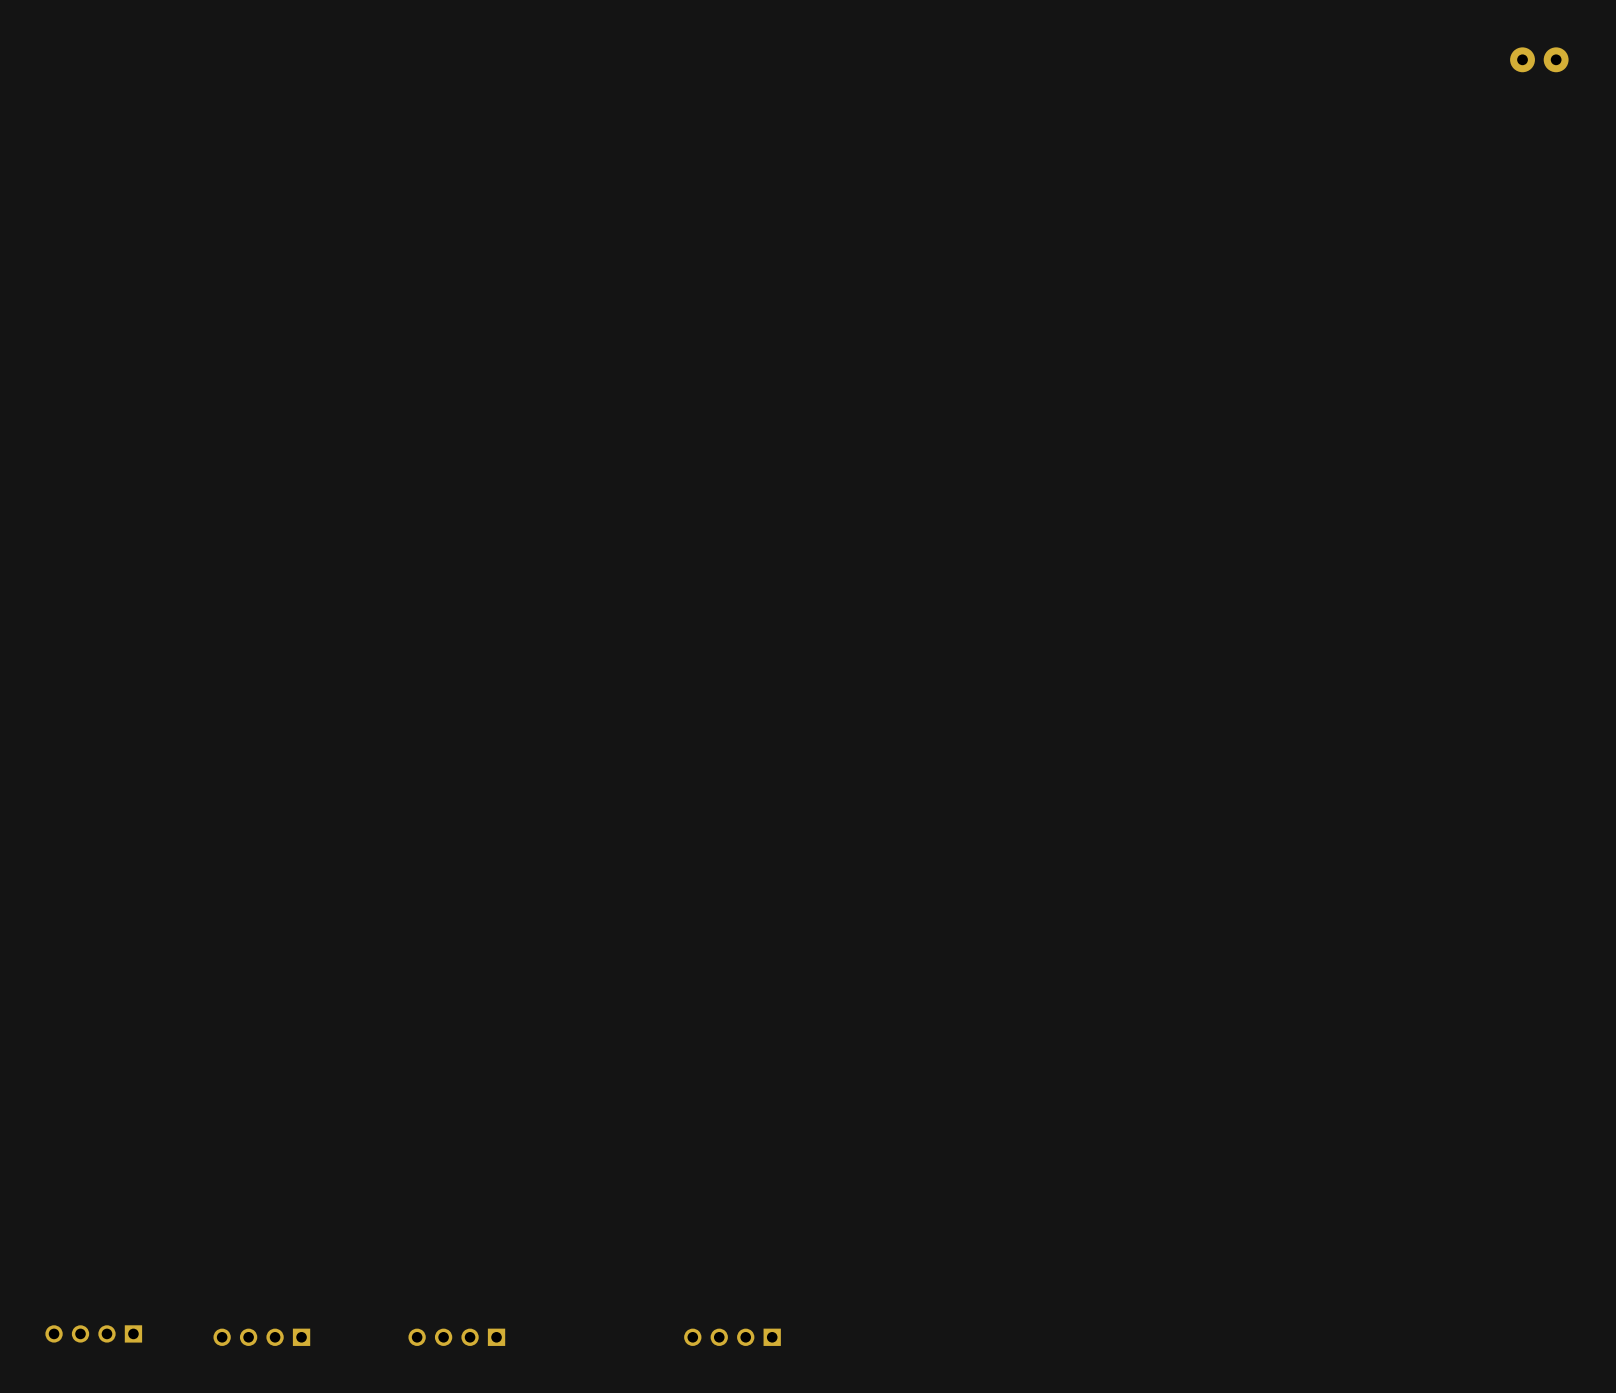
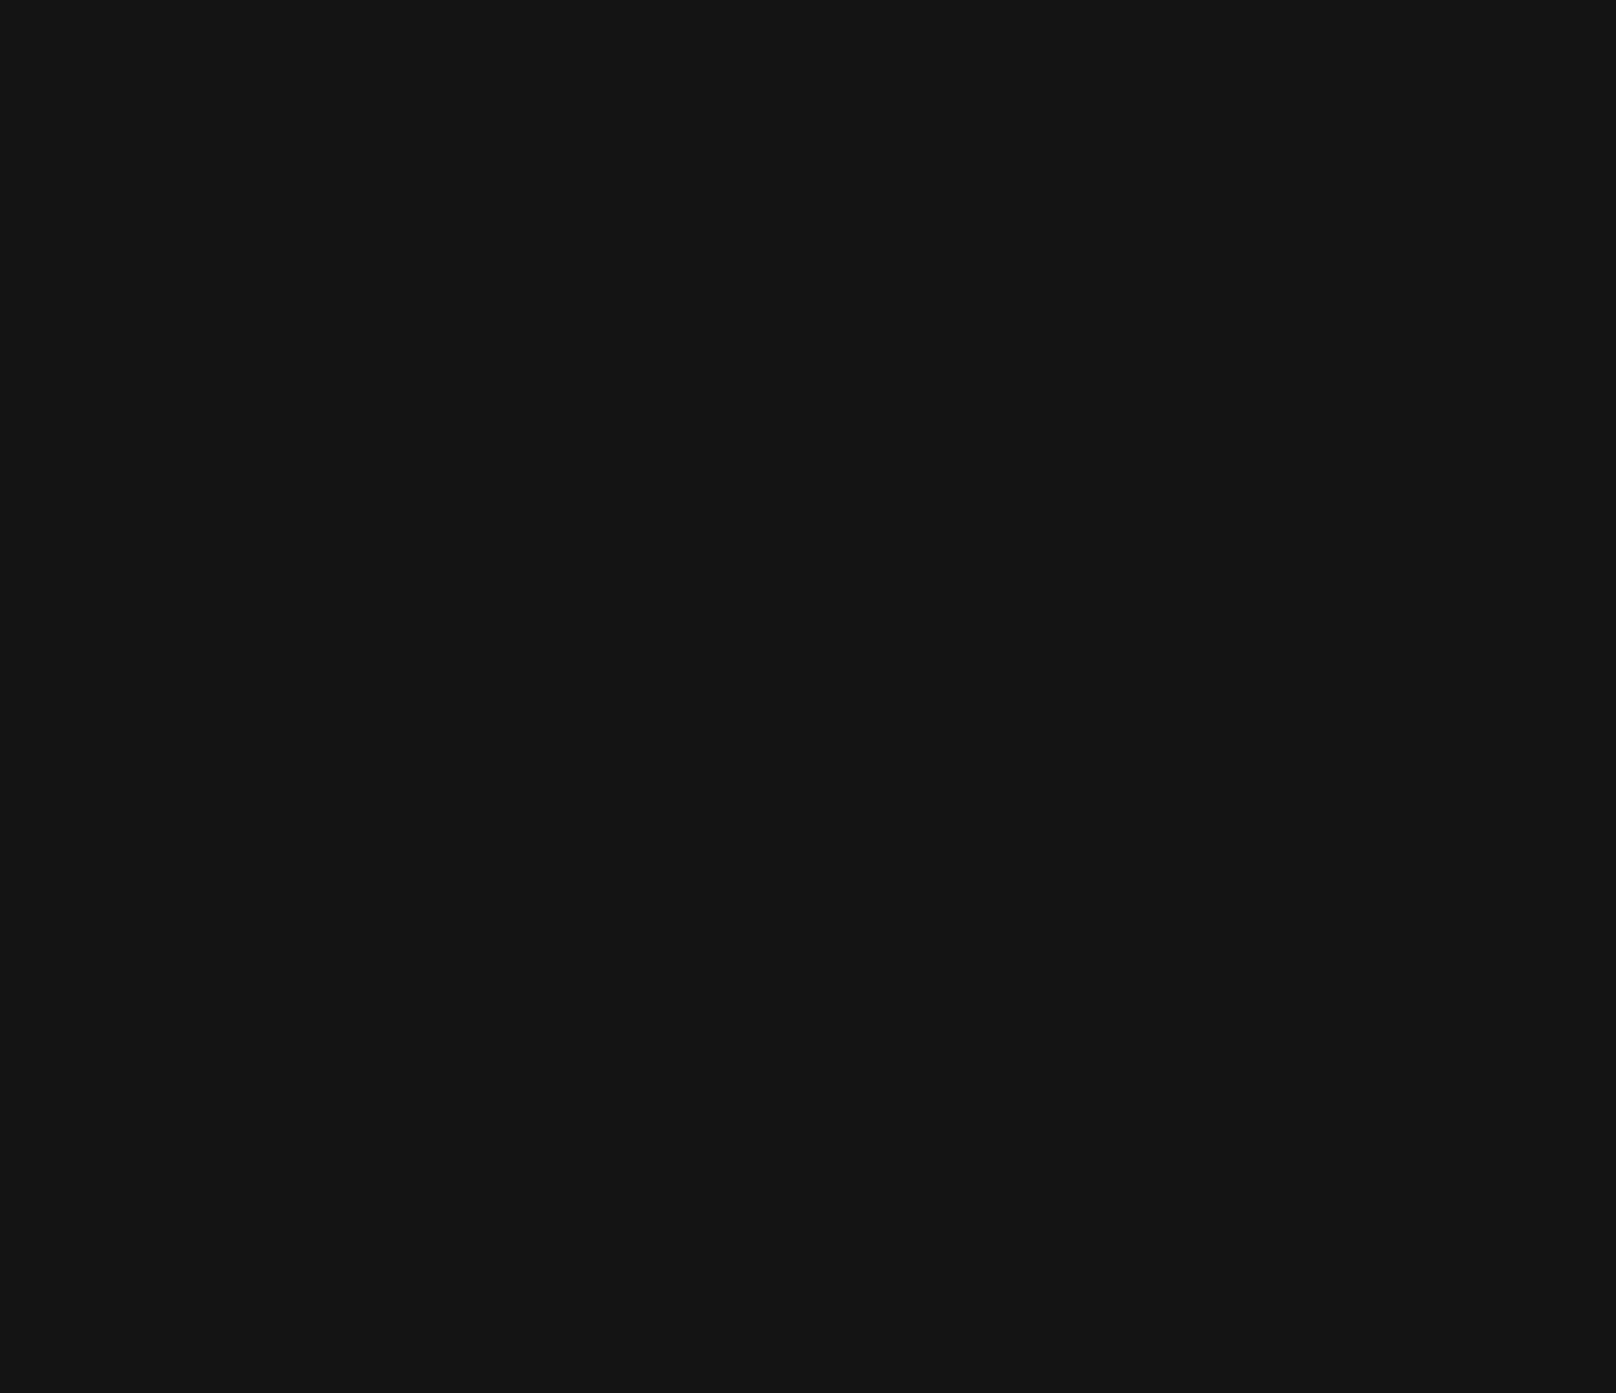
part: (1539, 59) -> none
part: (93, 1333) -> none
part: (261, 1337) -> none
part: (456, 1337) -> none
part: (732, 1337) -> none

